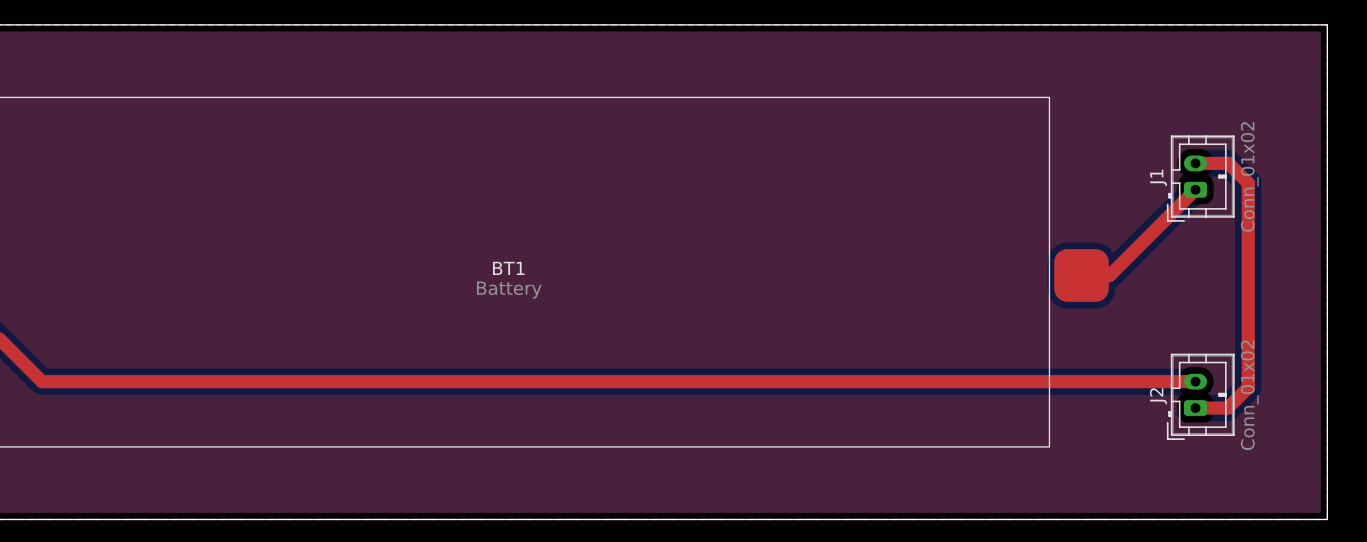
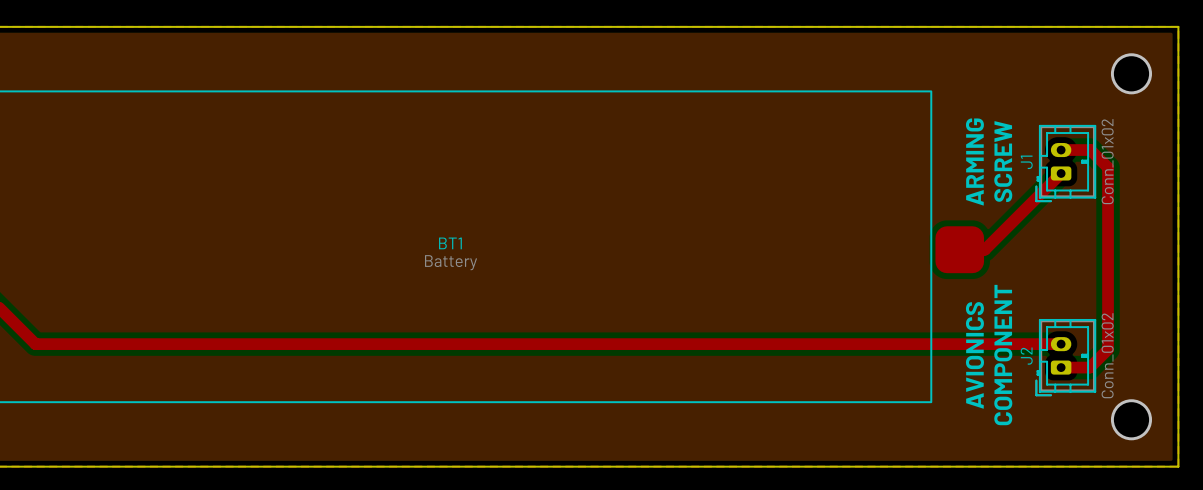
via: none -> (1131, 73)
text: none -> SCREW (1003, 161)
text: none -> ARMING (974, 162)
text: none -> COMPONENT (1003, 355)
text: none -> AVIONICS (974, 355)
via: none -> (1131, 419)

